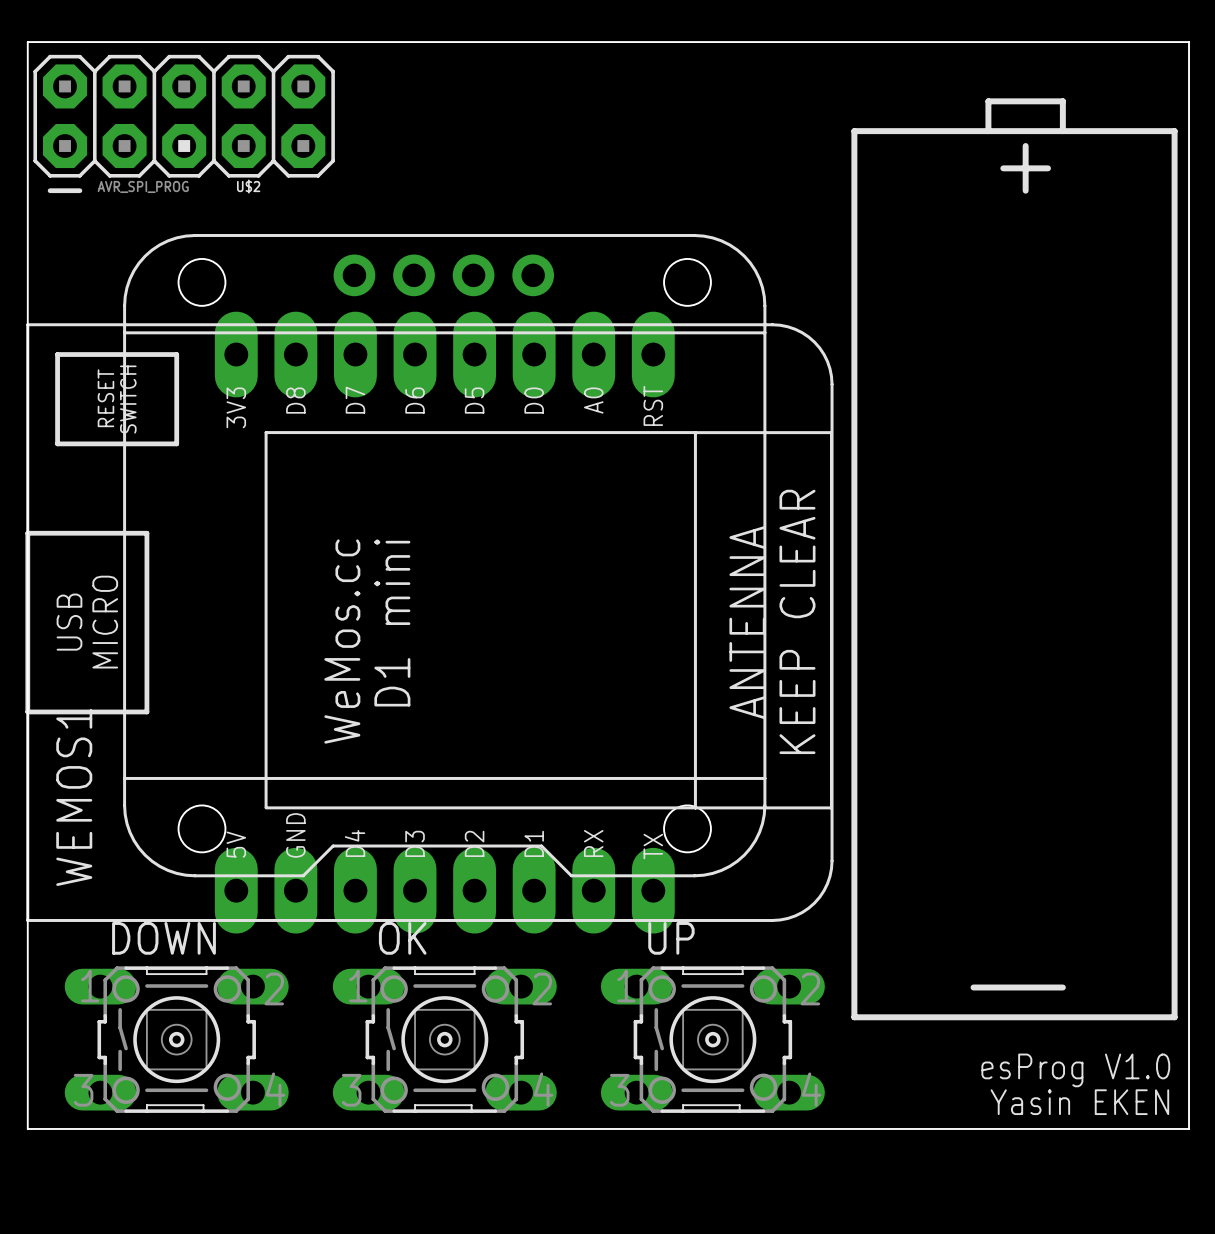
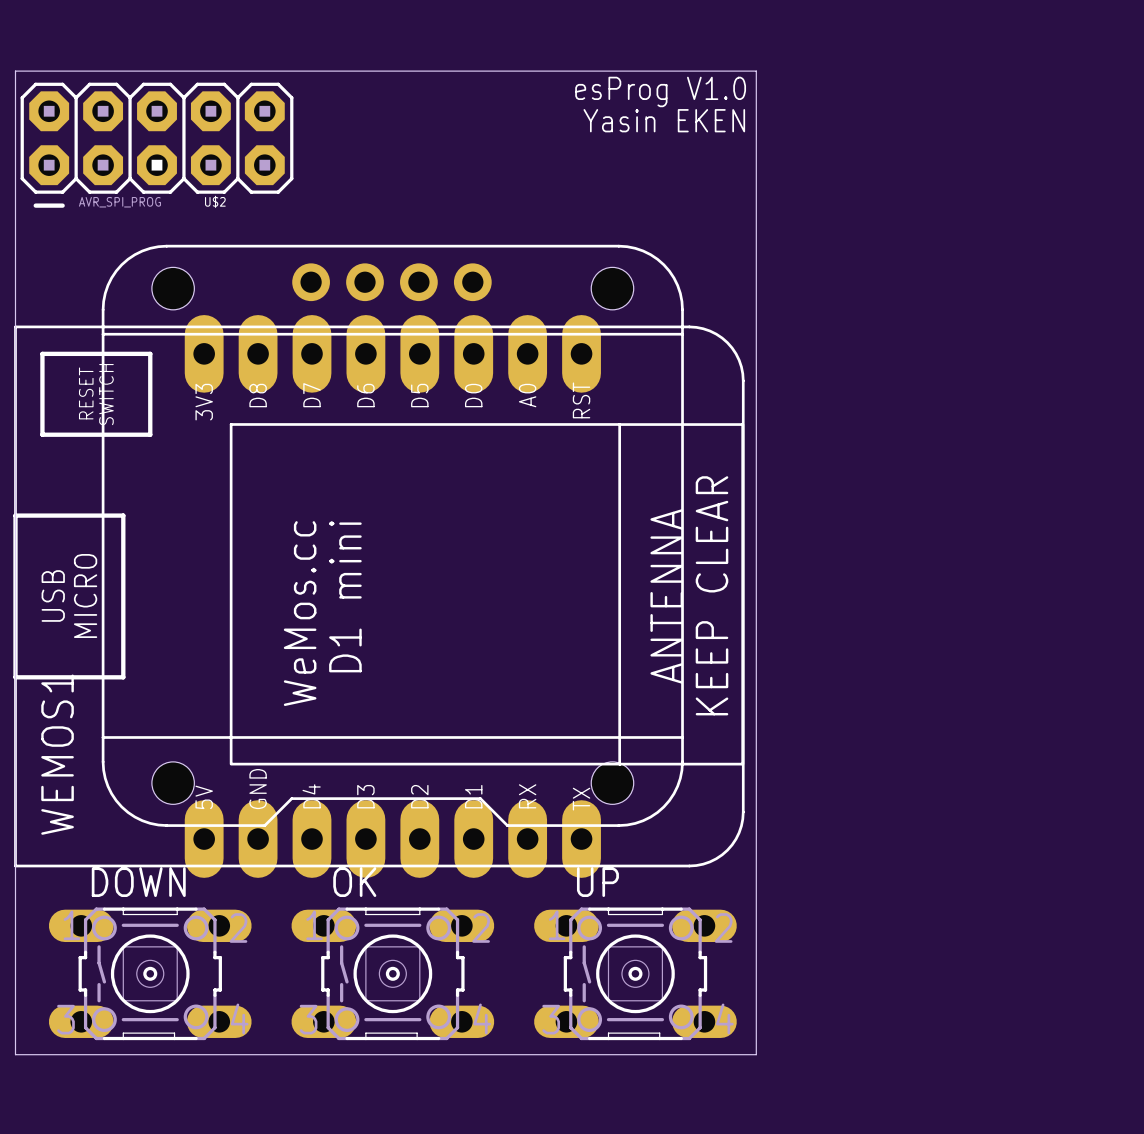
board edge: (846, 42) (1189, 42) (1189, 1128) (846, 1128) -> (756, 71) (756, 1054)
text: none -> esProg V1.0 (660, 91)
text: none -> Yasin EKEN (664, 120)
line: (854, 131) (854, 1017) (1174, 1017) (1174, 131) (854, 131) -> none
line: (988, 131) (988, 101) (1062, 101) (1062, 131) -> none
line: (1025, 146) (1025, 190) -> none
line: (1003, 168) (1047, 168) -> none
line: (973, 987) (1062, 987) -> none
text: esProg V1.0 (1075, 1070) -> none
text: Yasin EKEN (1079, 1102) -> none

